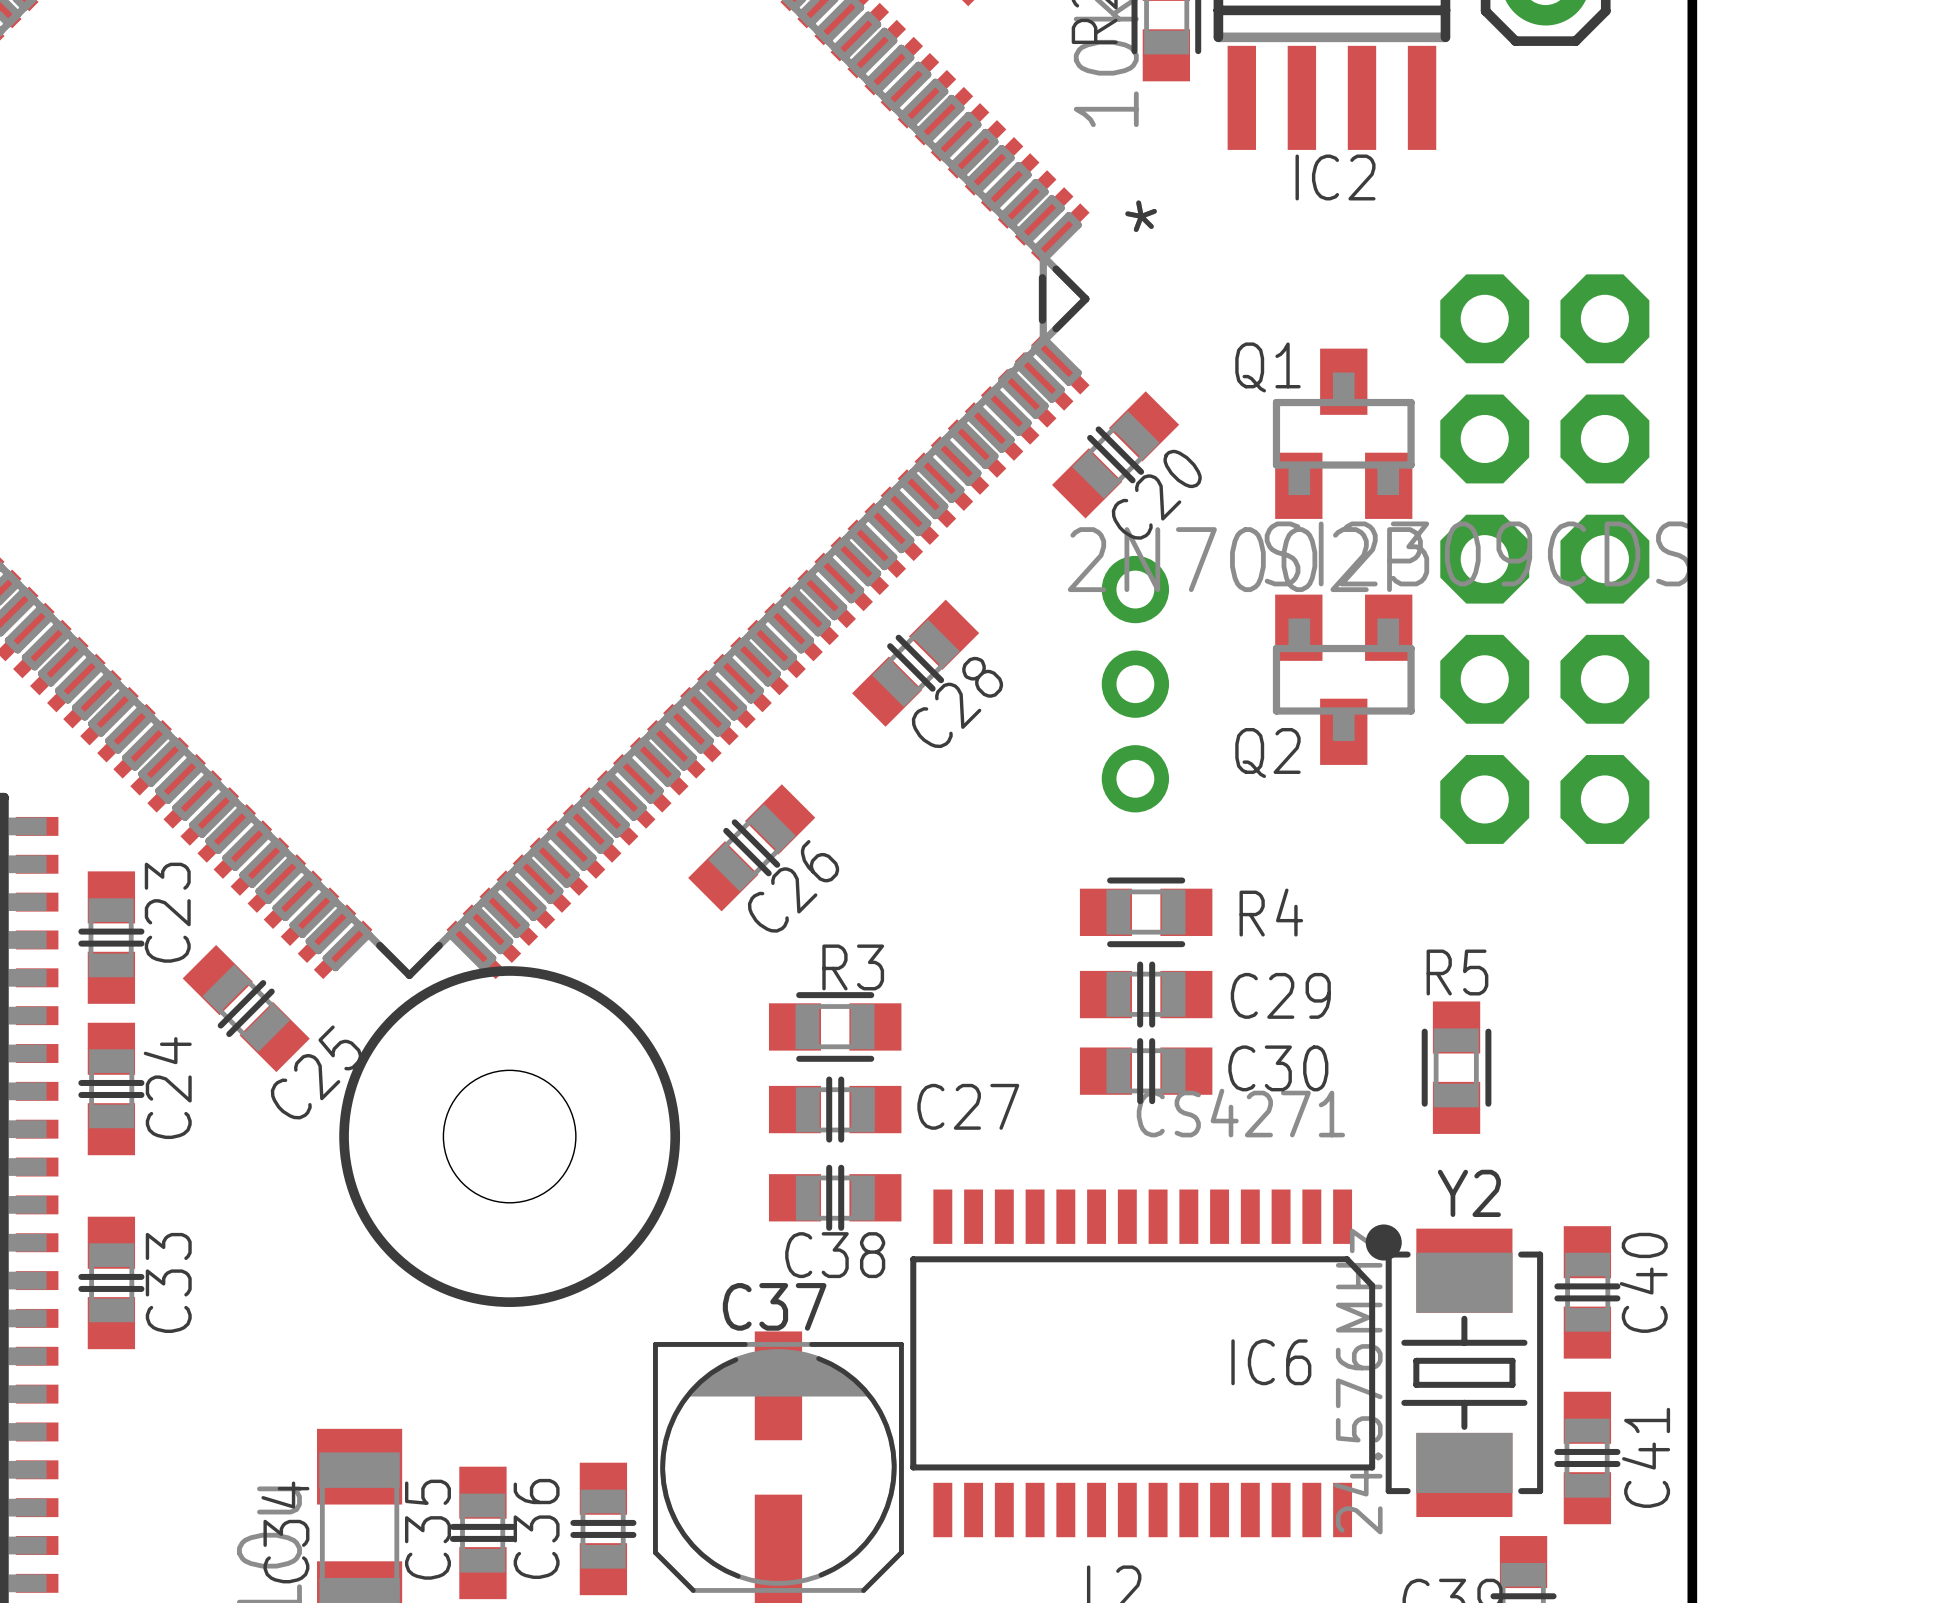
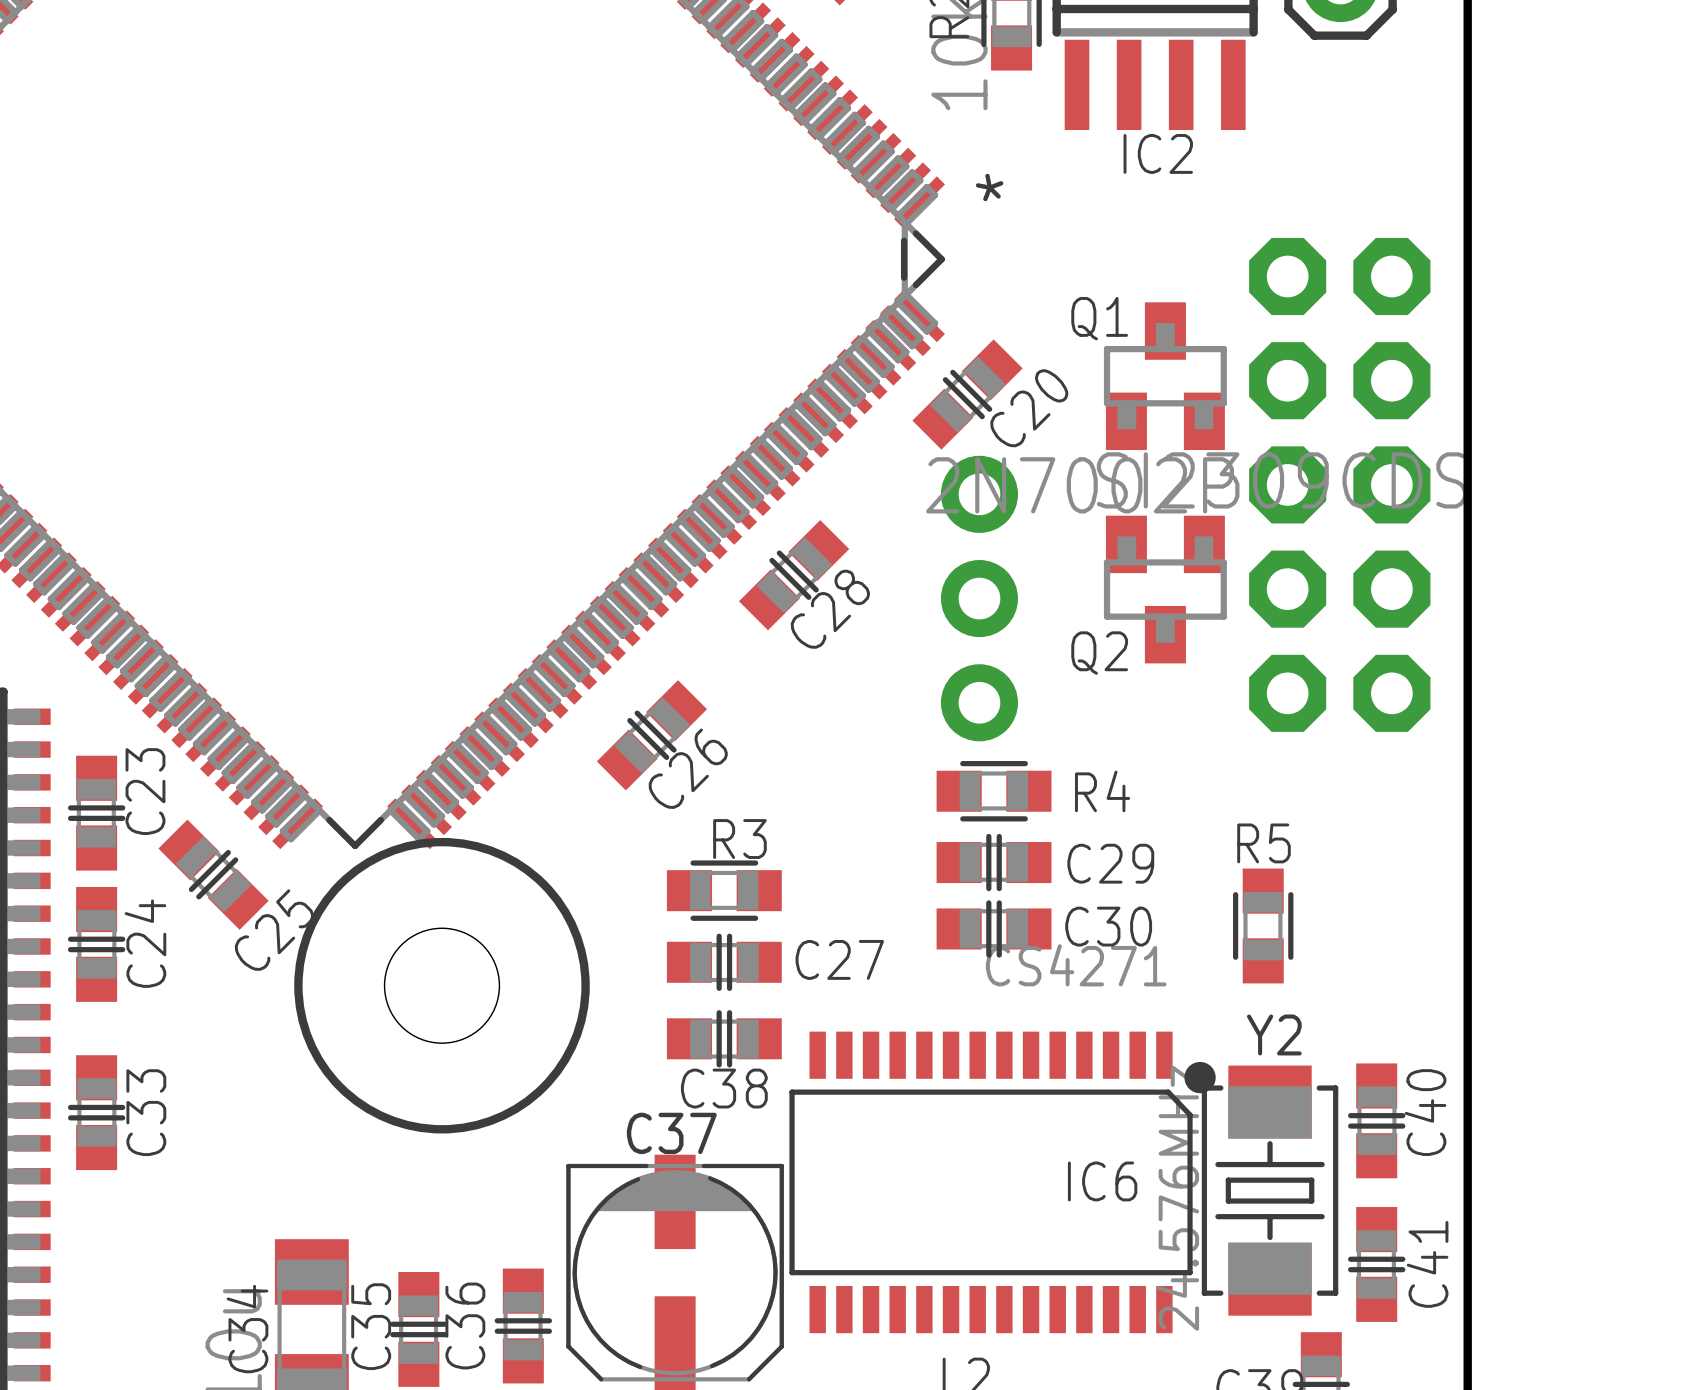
C20 name position: C20 (1156, 494) -> C20 (1029, 408)
part footprint: [1101, 555, 1170, 813] -> [940, 455, 1019, 742]

